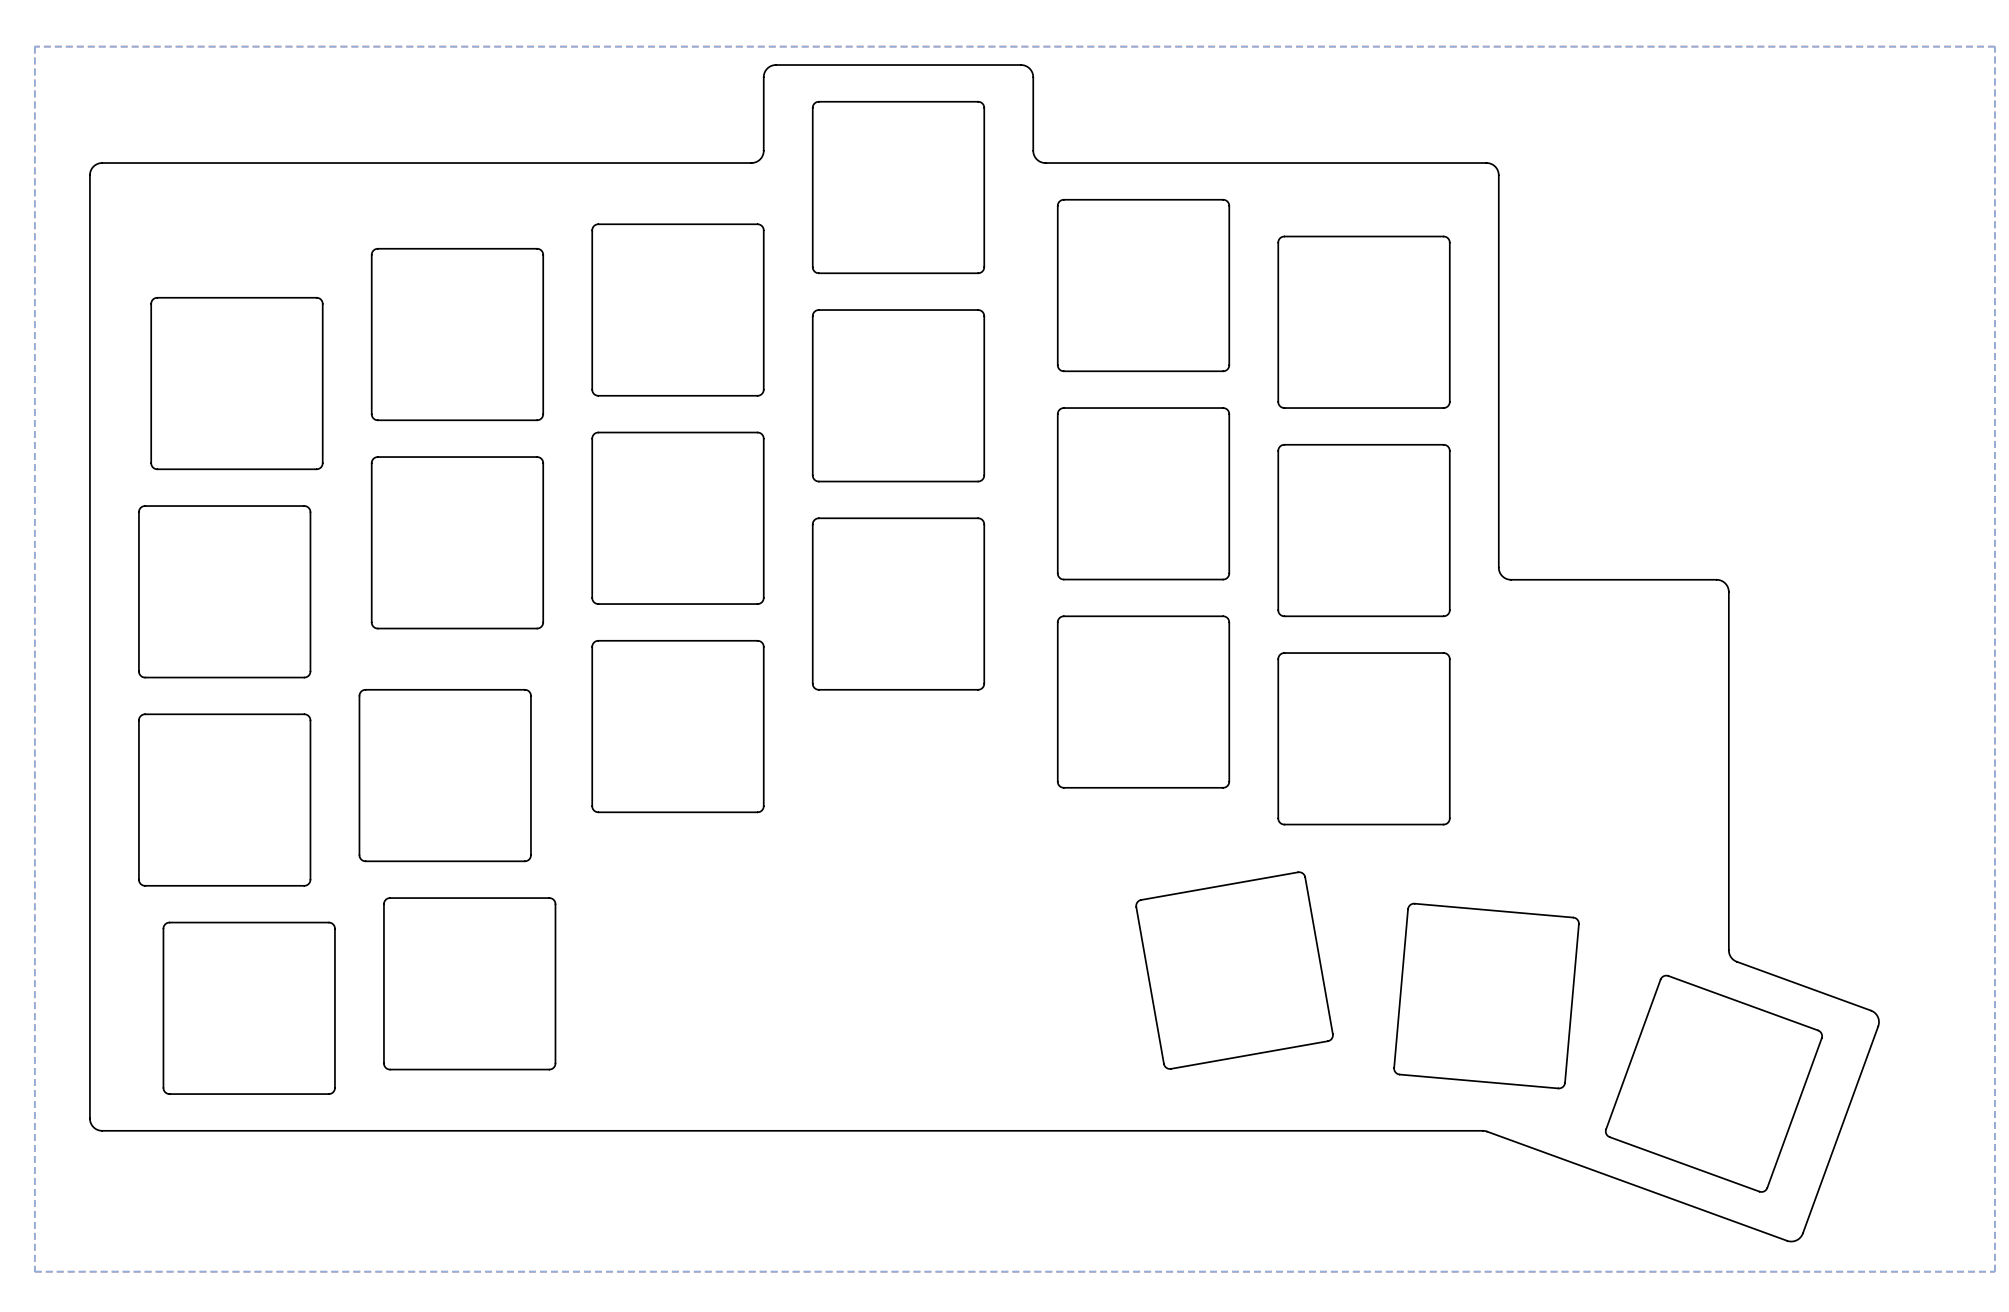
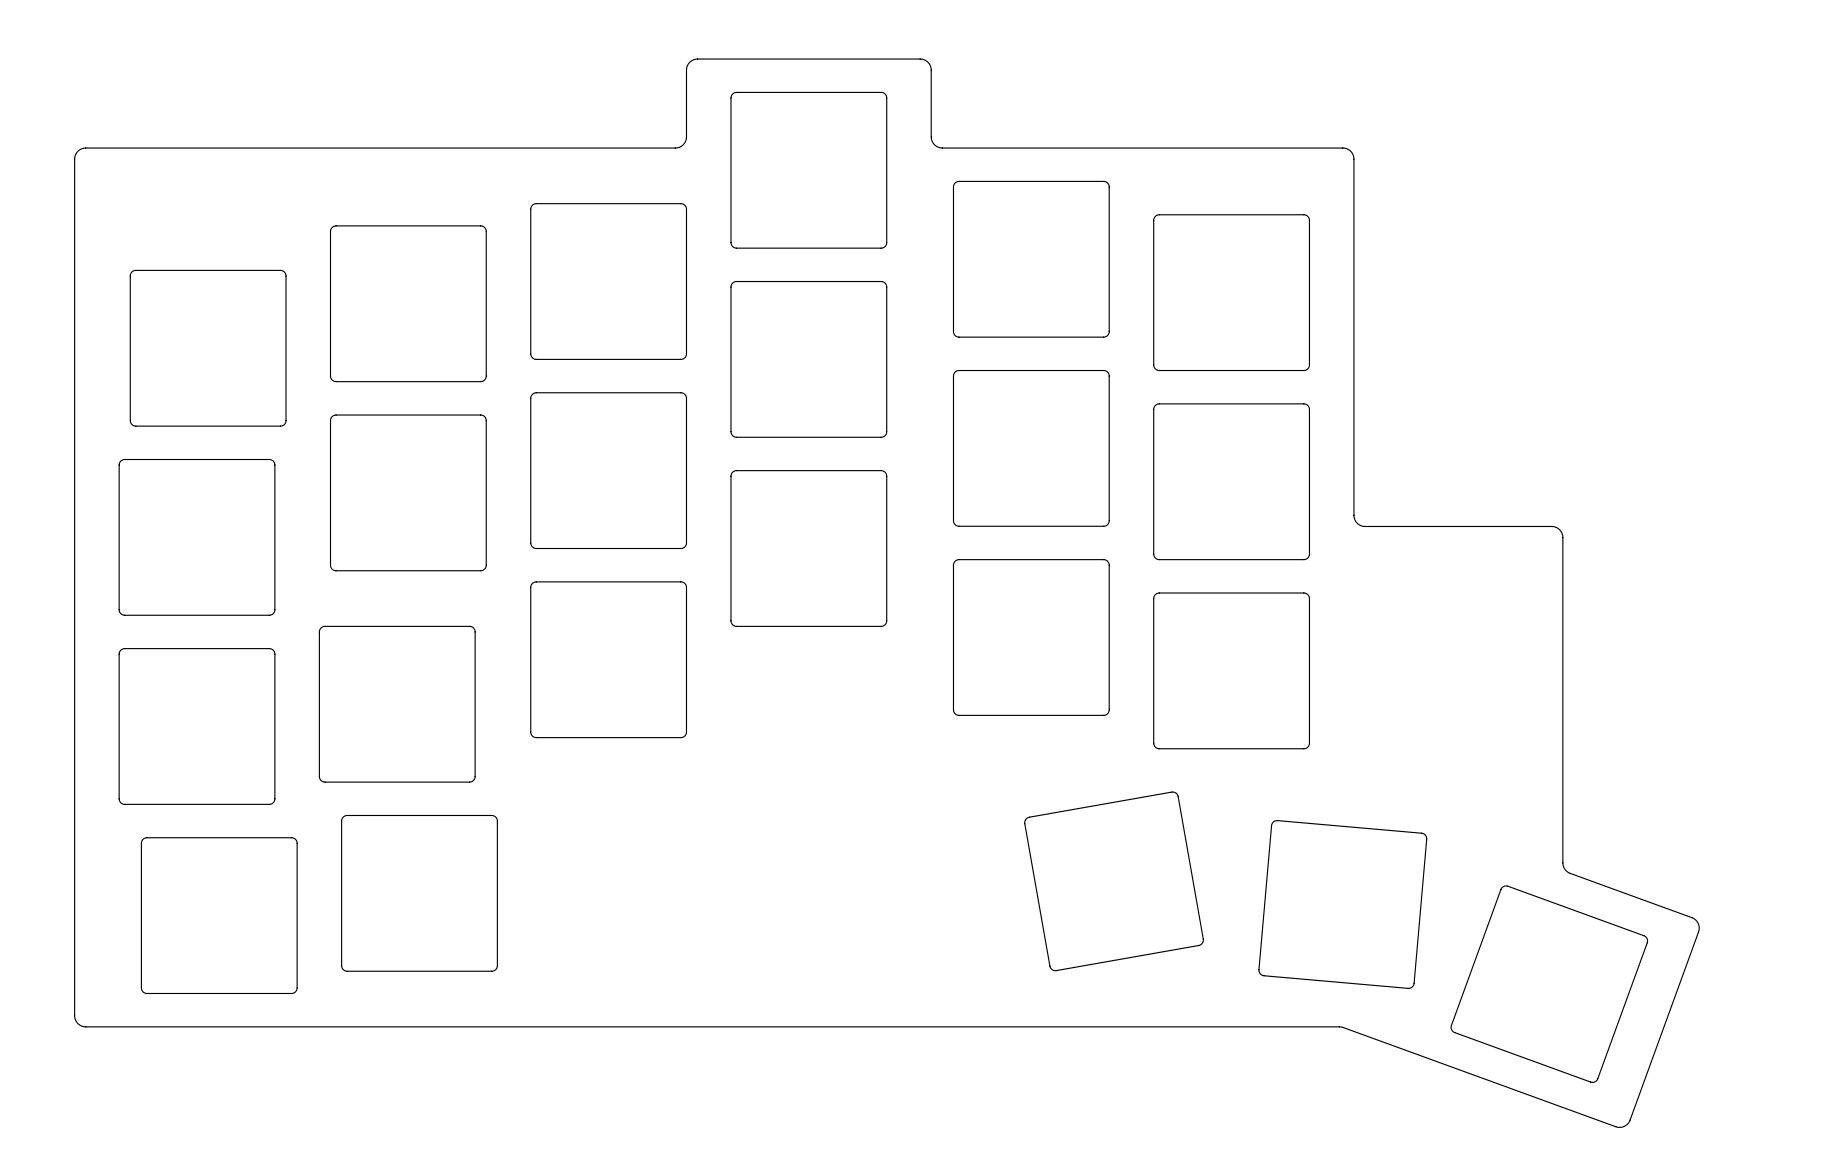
bottom zone outline: (1994, 46) (1994, 1271) (34, 1271) (34, 46) (1994, 46) -> none

